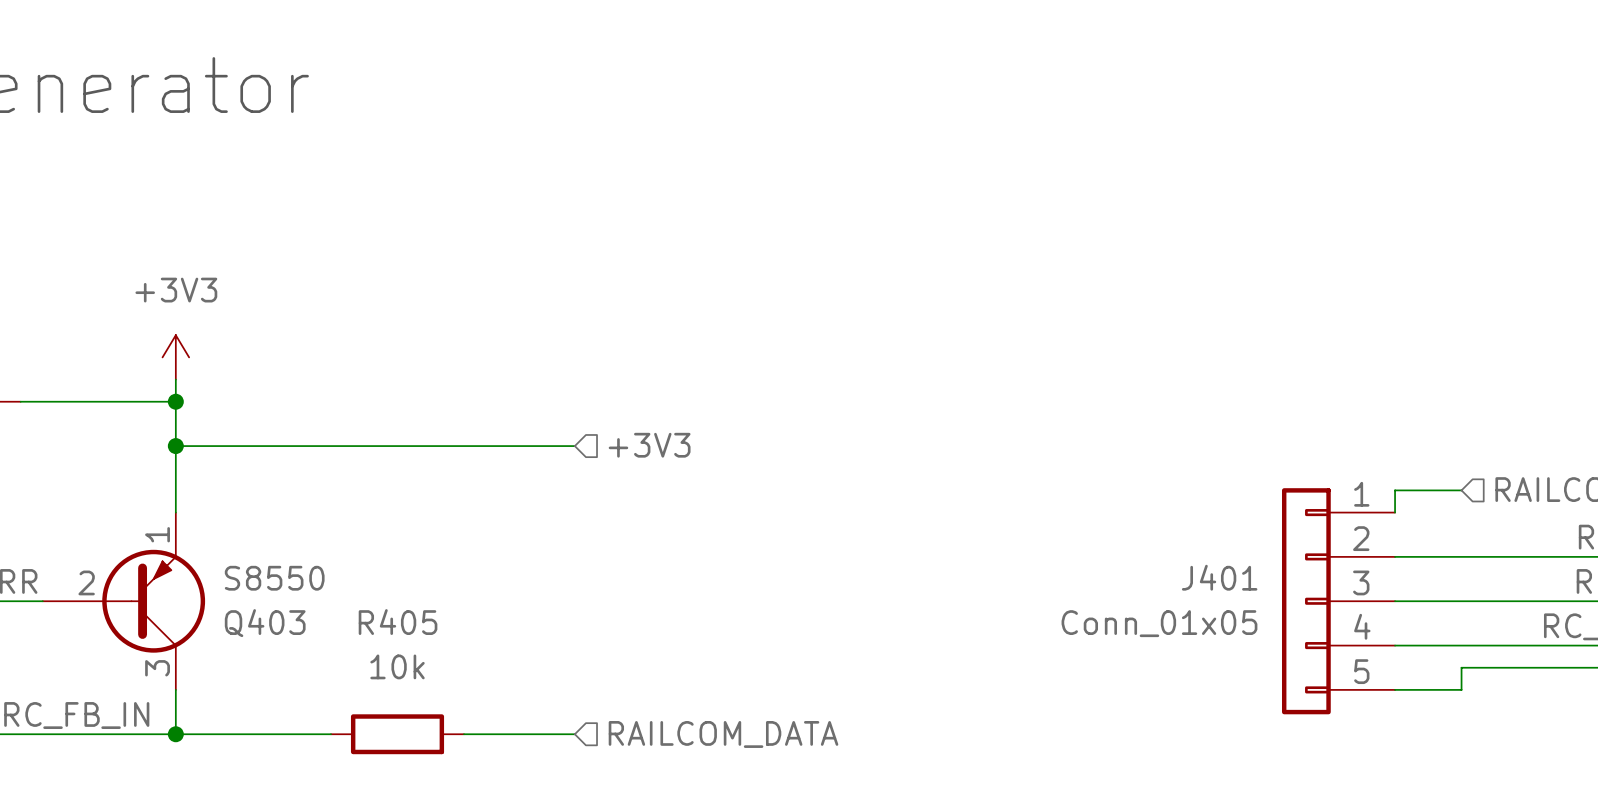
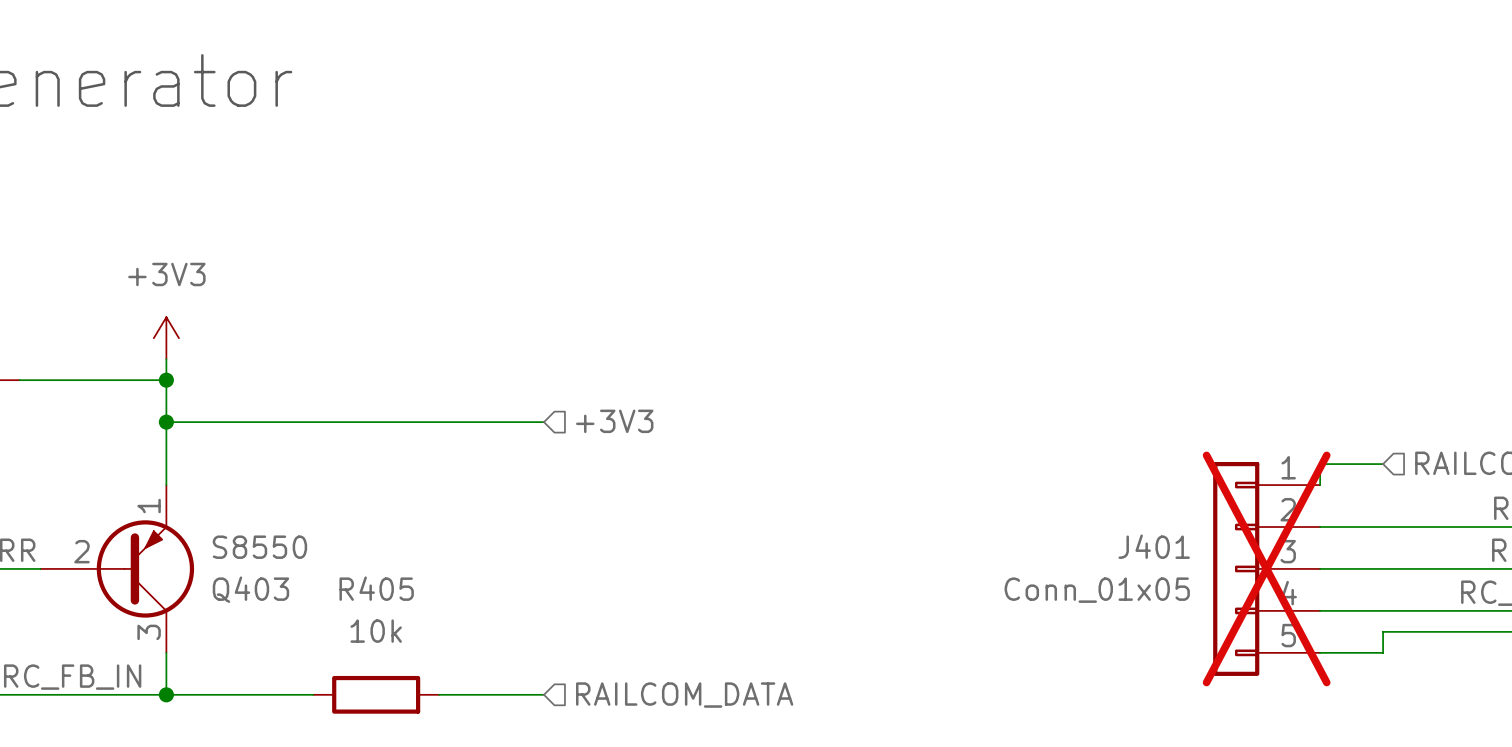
J401 do-not-place cross: none -> (1266, 568)

